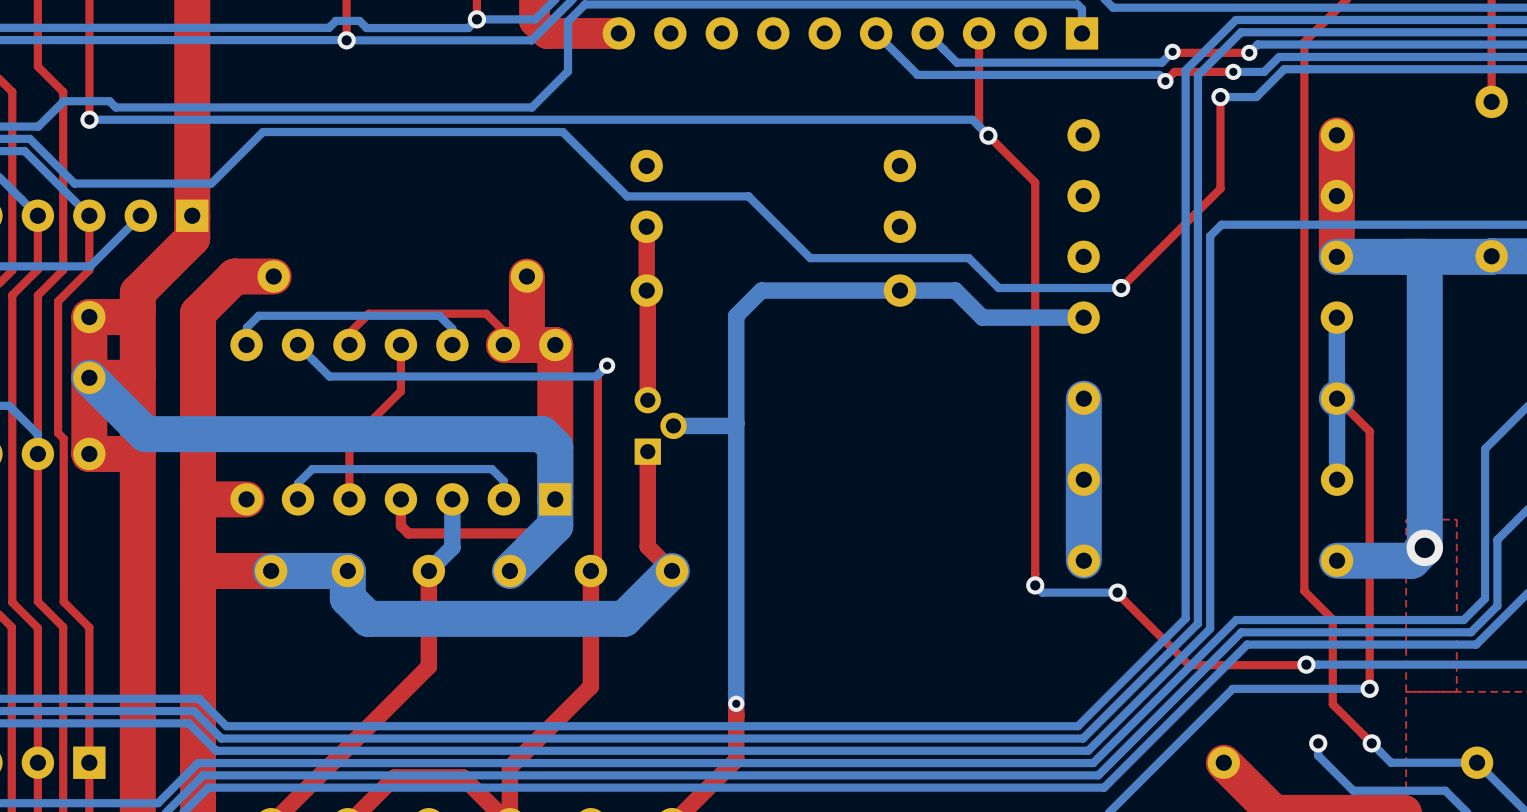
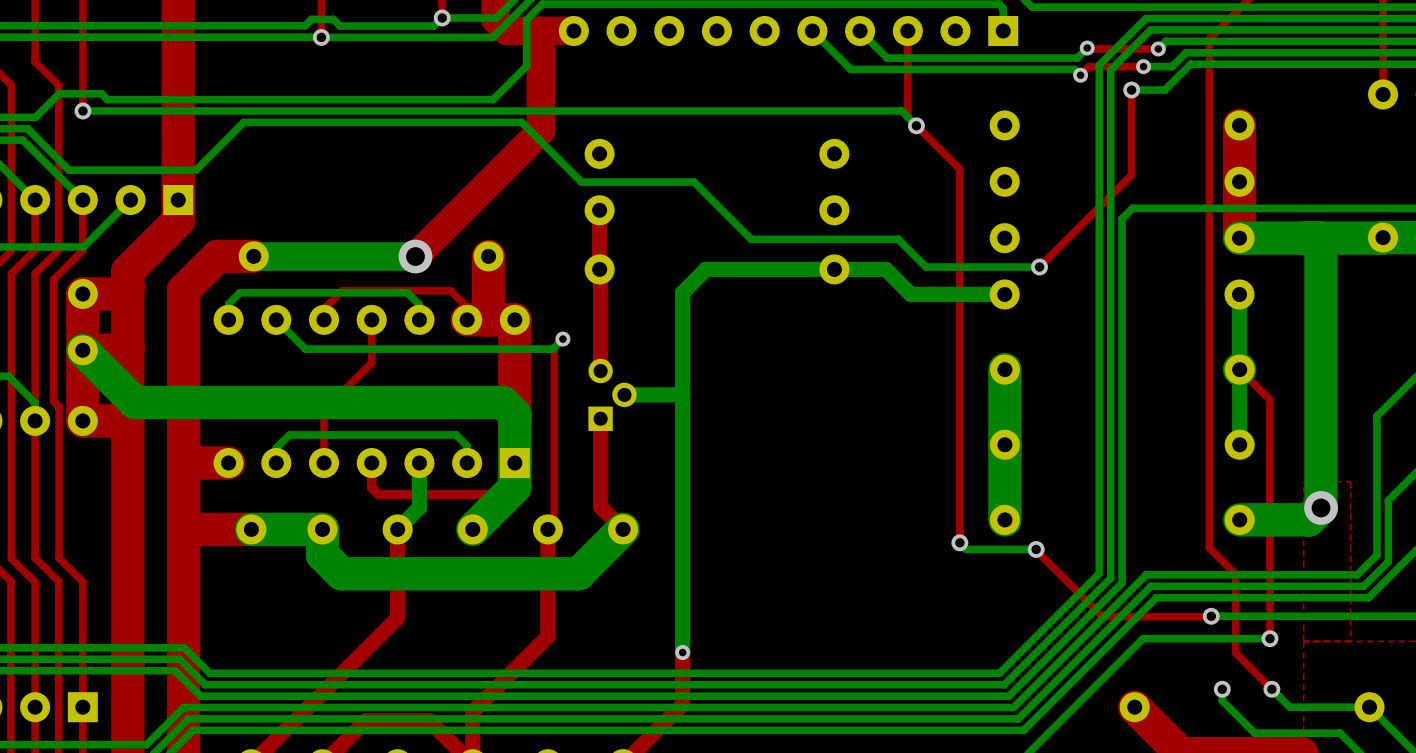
top track: none -> (540, 30) (540, 131) (415, 256)
bottom track: none -> (415, 256) (253, 256)
via: none -> (415, 256)

